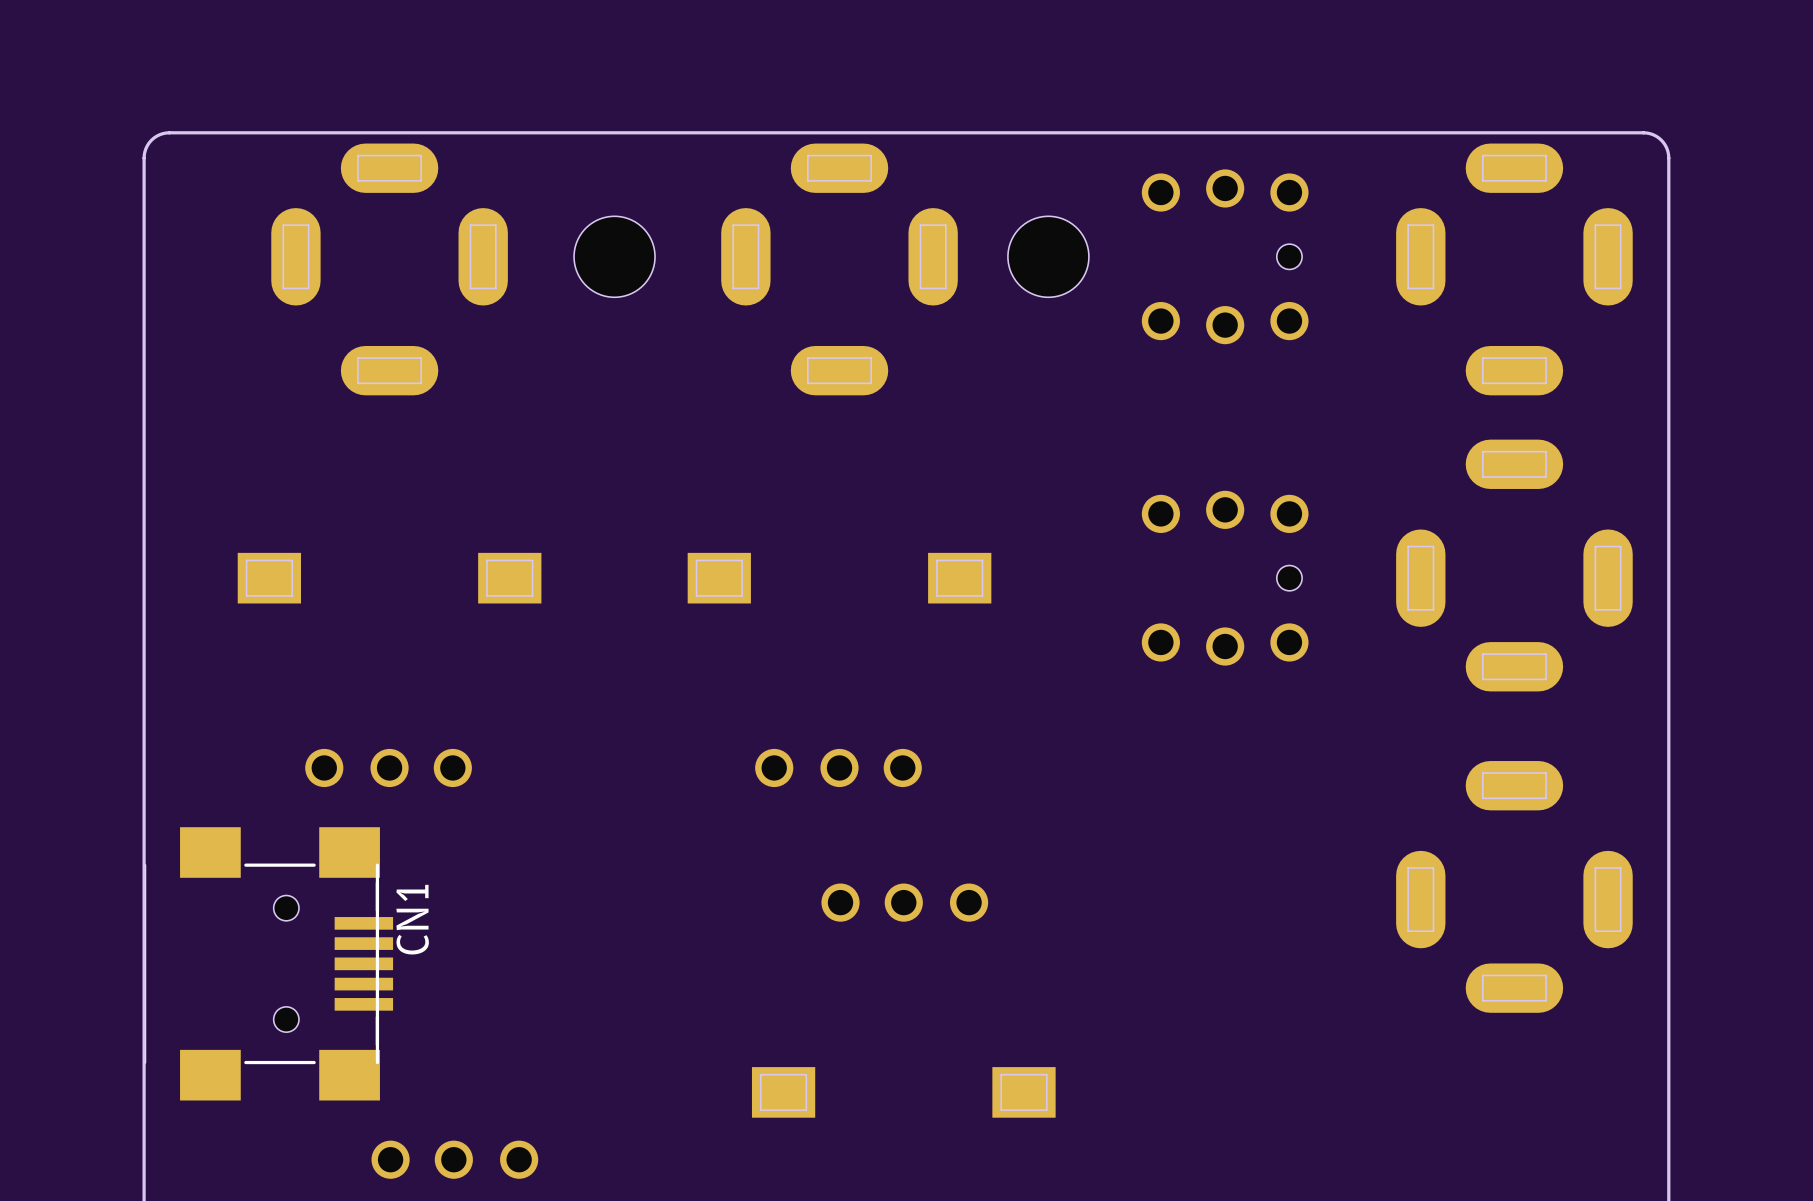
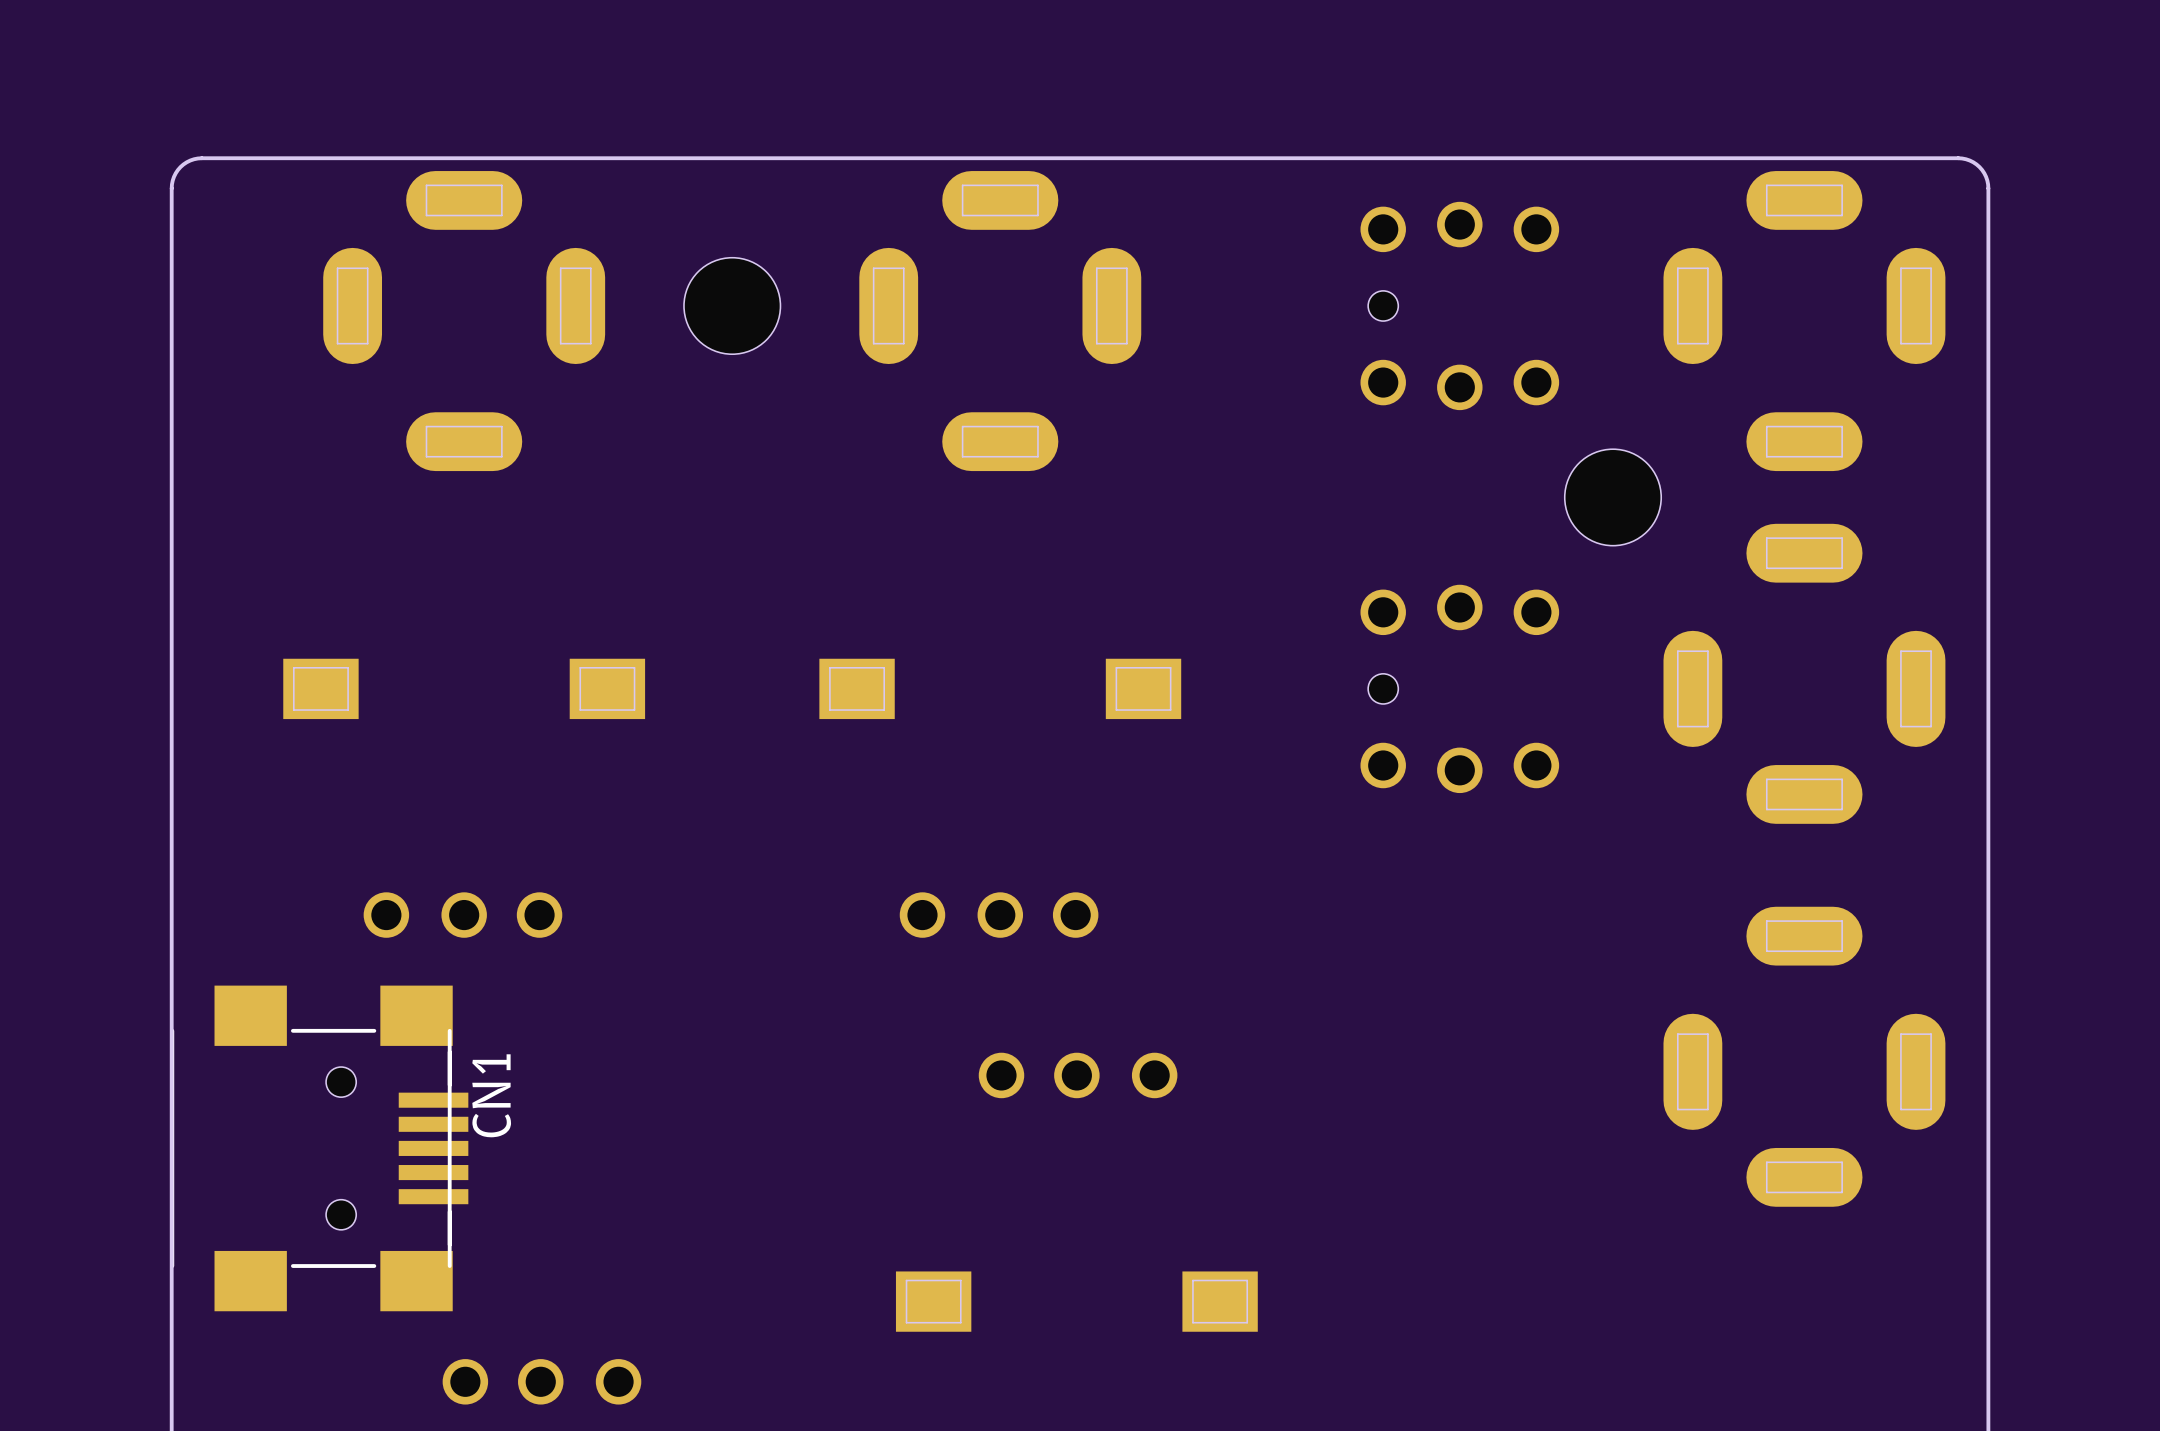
hole position: (1048, 256) -> (1612, 497)
part rotation: 0° (1225, 256) -> 180° (1459, 305)
part rotation: 0° (1225, 578) -> 180° (1459, 688)

